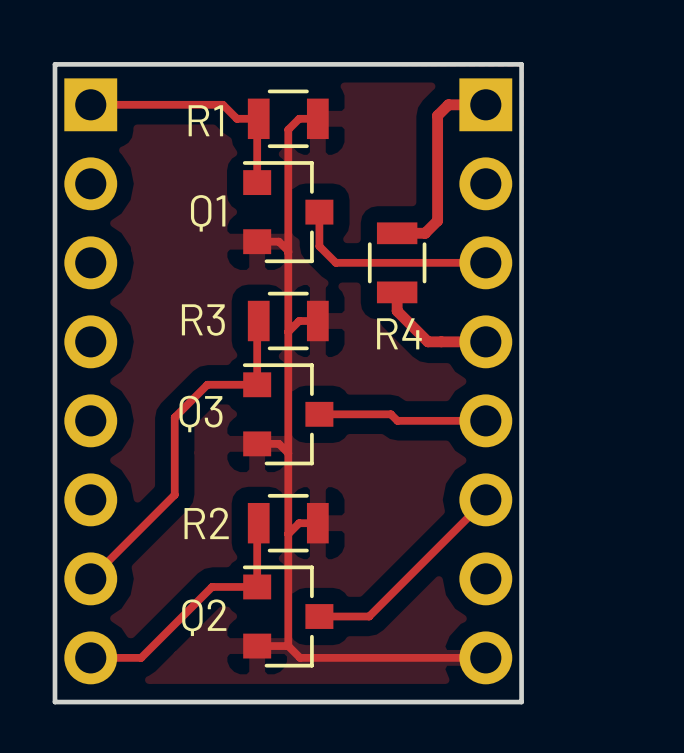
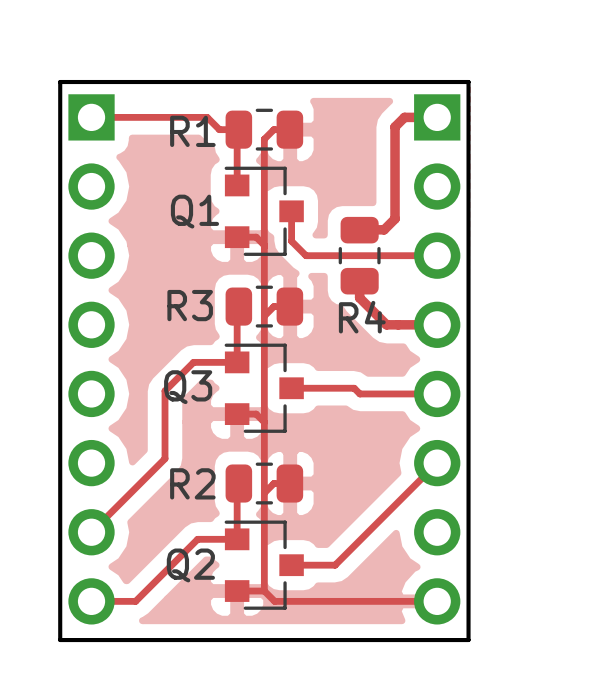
R1 footprint: [247, 89, 329, 149] -> [225, 108, 304, 151]
R4 footprint: [367, 222, 427, 304] -> [338, 216, 381, 295]
R3 footprint: [247, 291, 329, 351] -> [225, 285, 304, 328]
R2 footprint: [247, 493, 329, 553] -> [225, 462, 304, 505]

